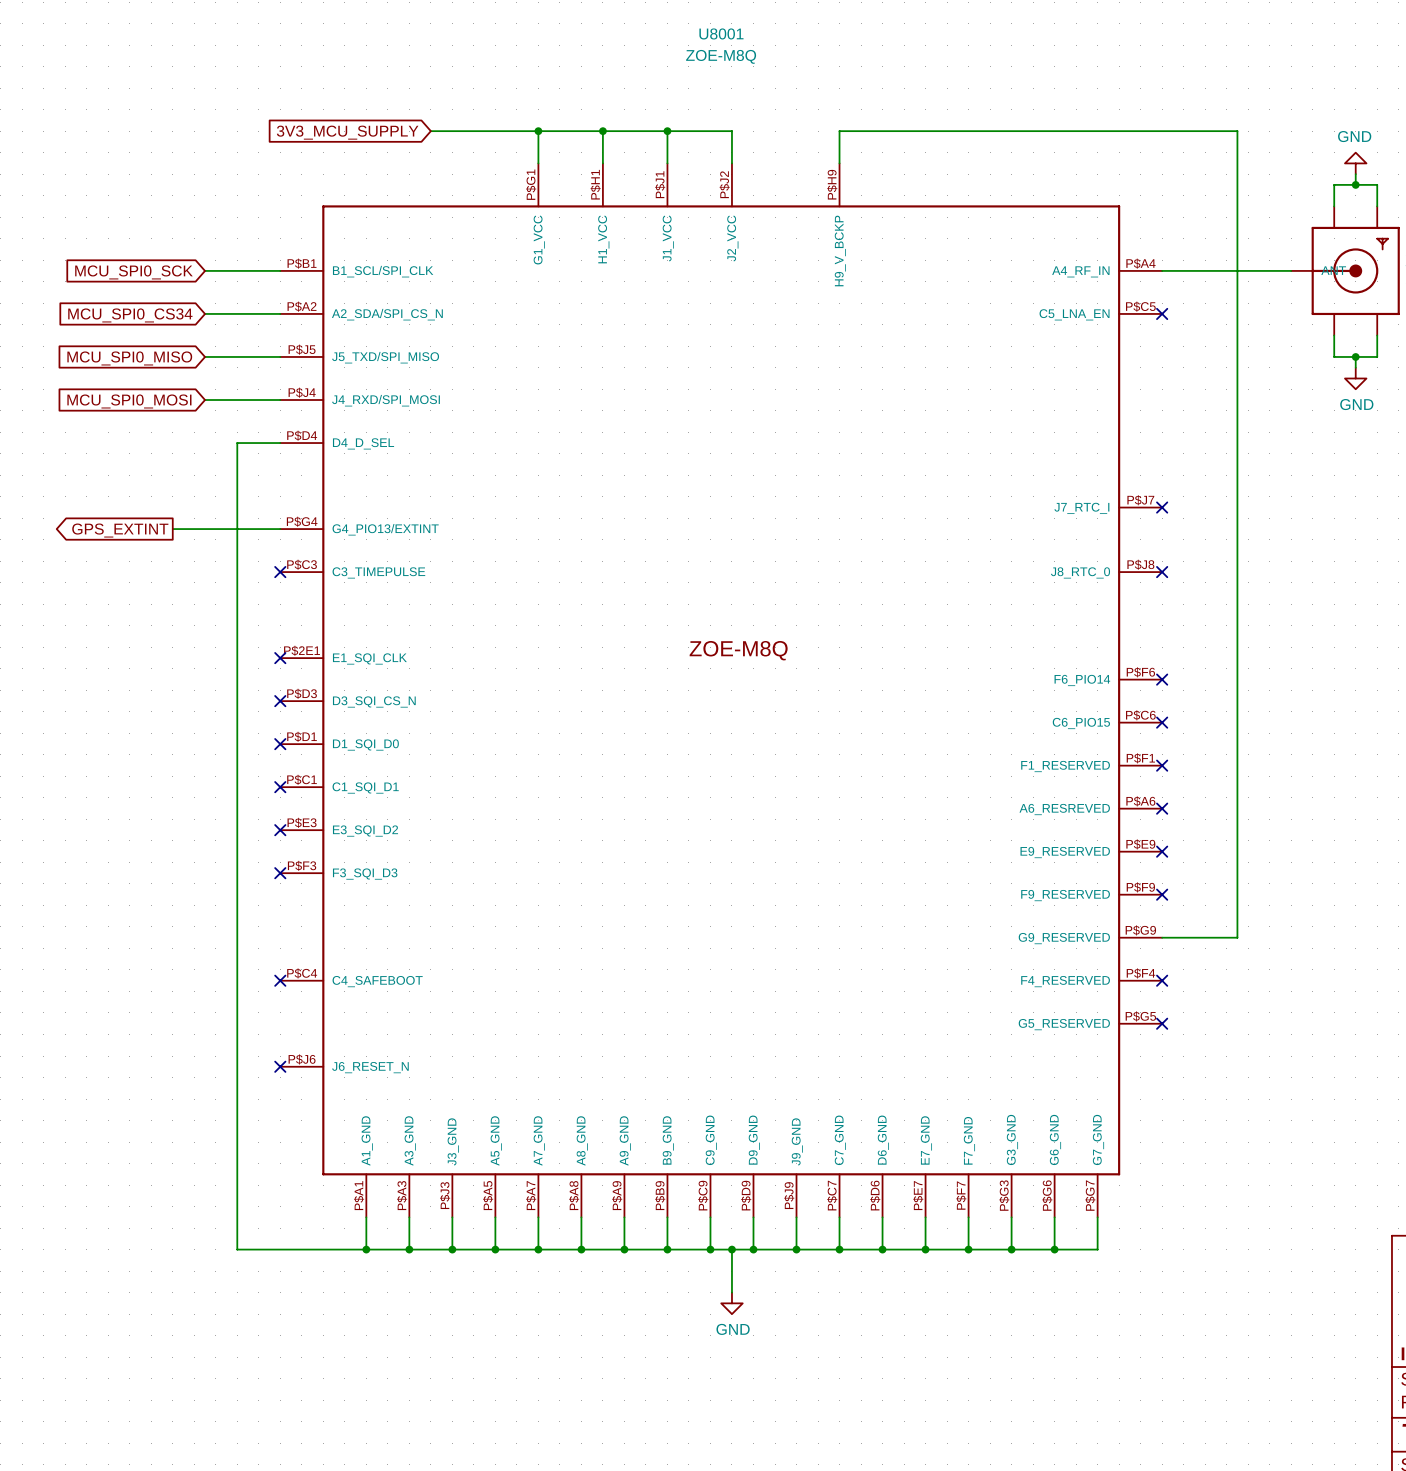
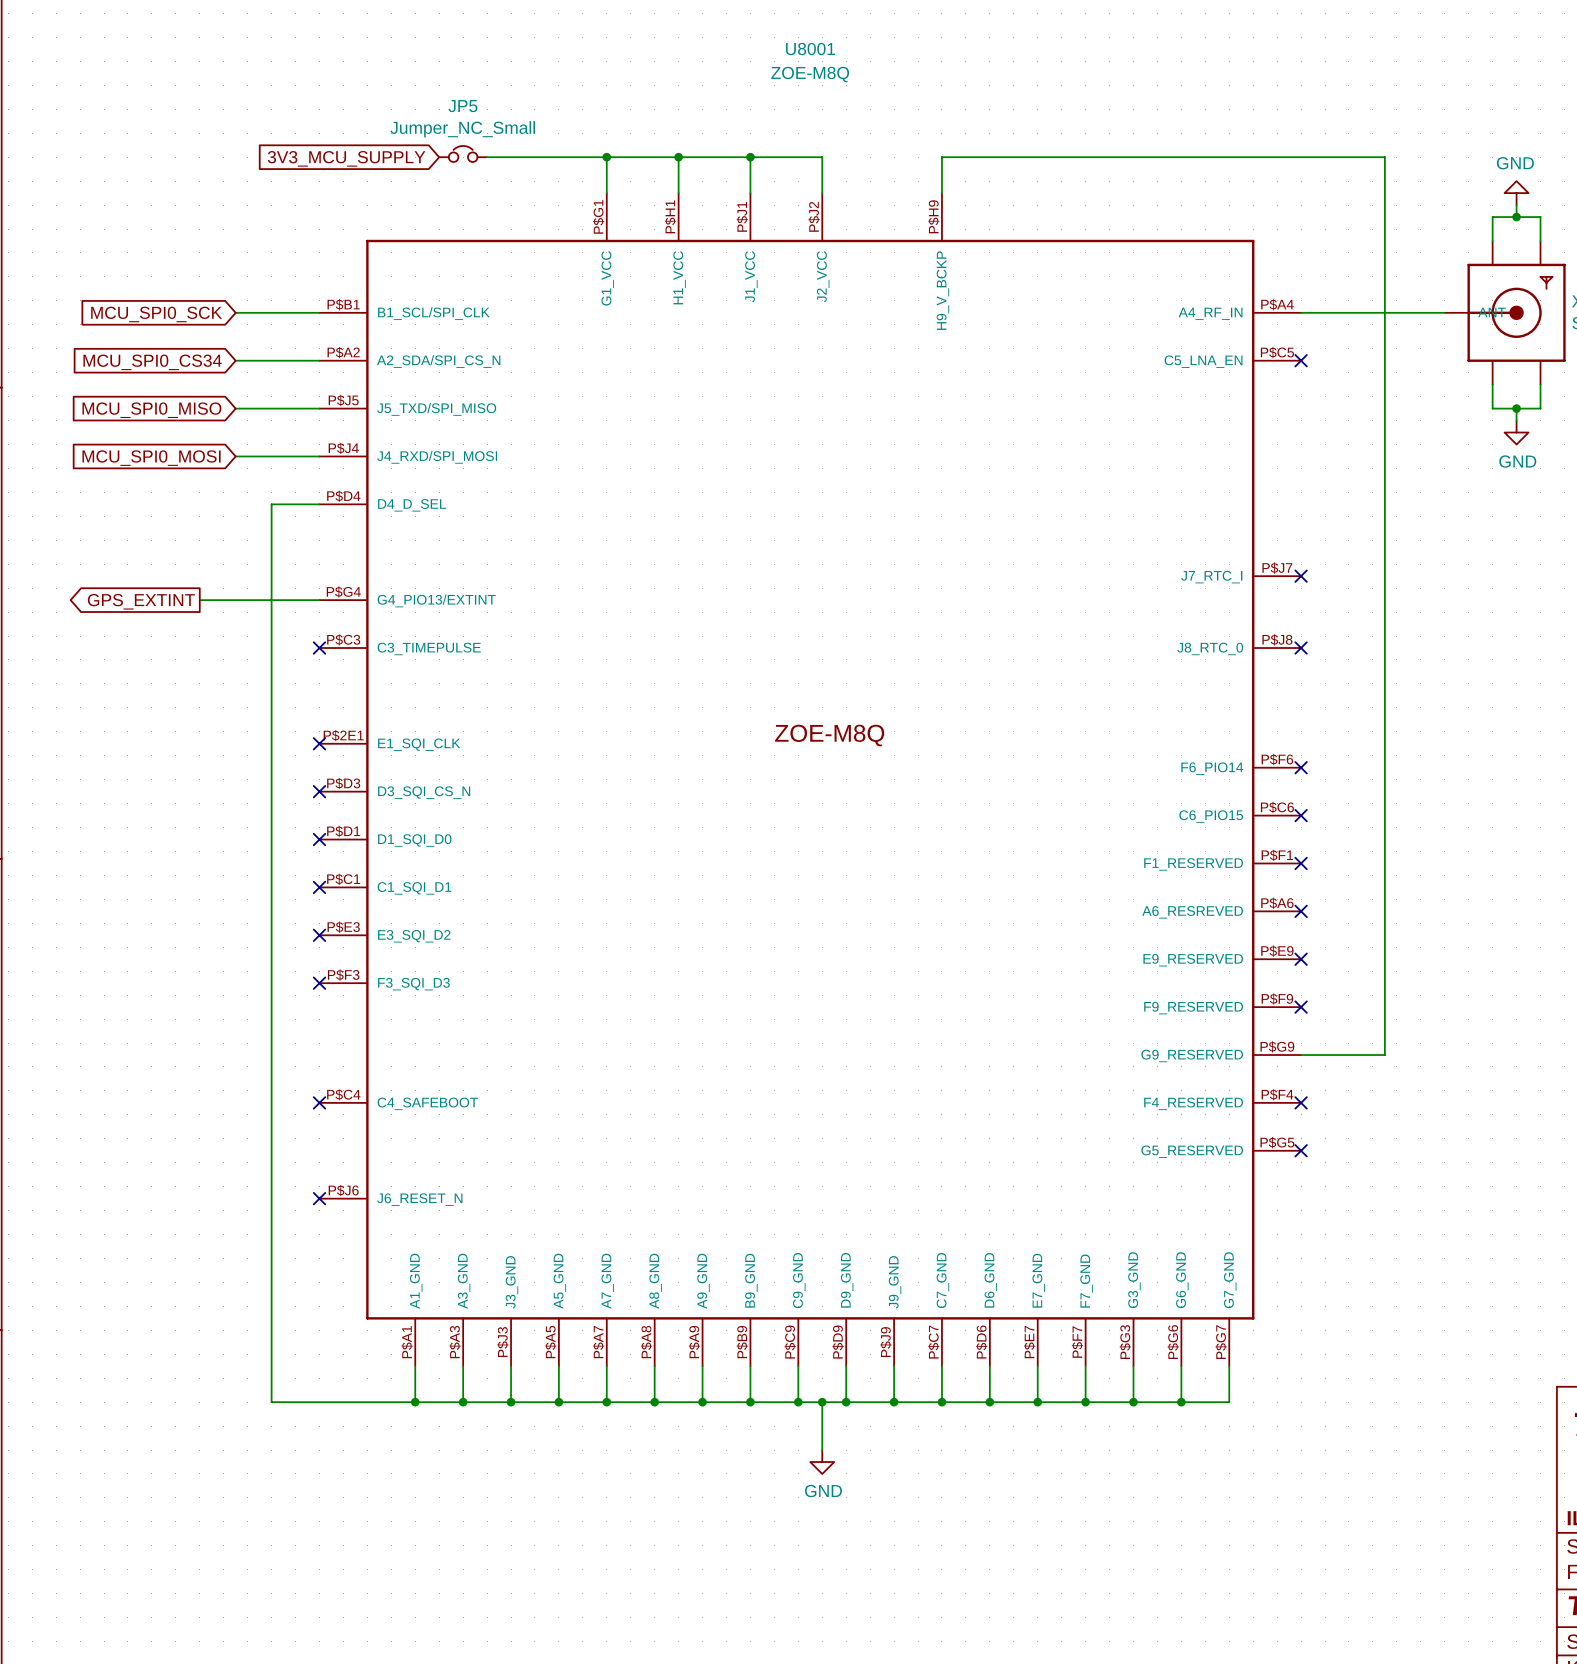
JP5: none -> Jumper_NC_Small (463, 153)
global label position: 3V3_MCU_SUPPLY (347, 132) -> 3V3_MCU_SUPPLY (346, 158)

